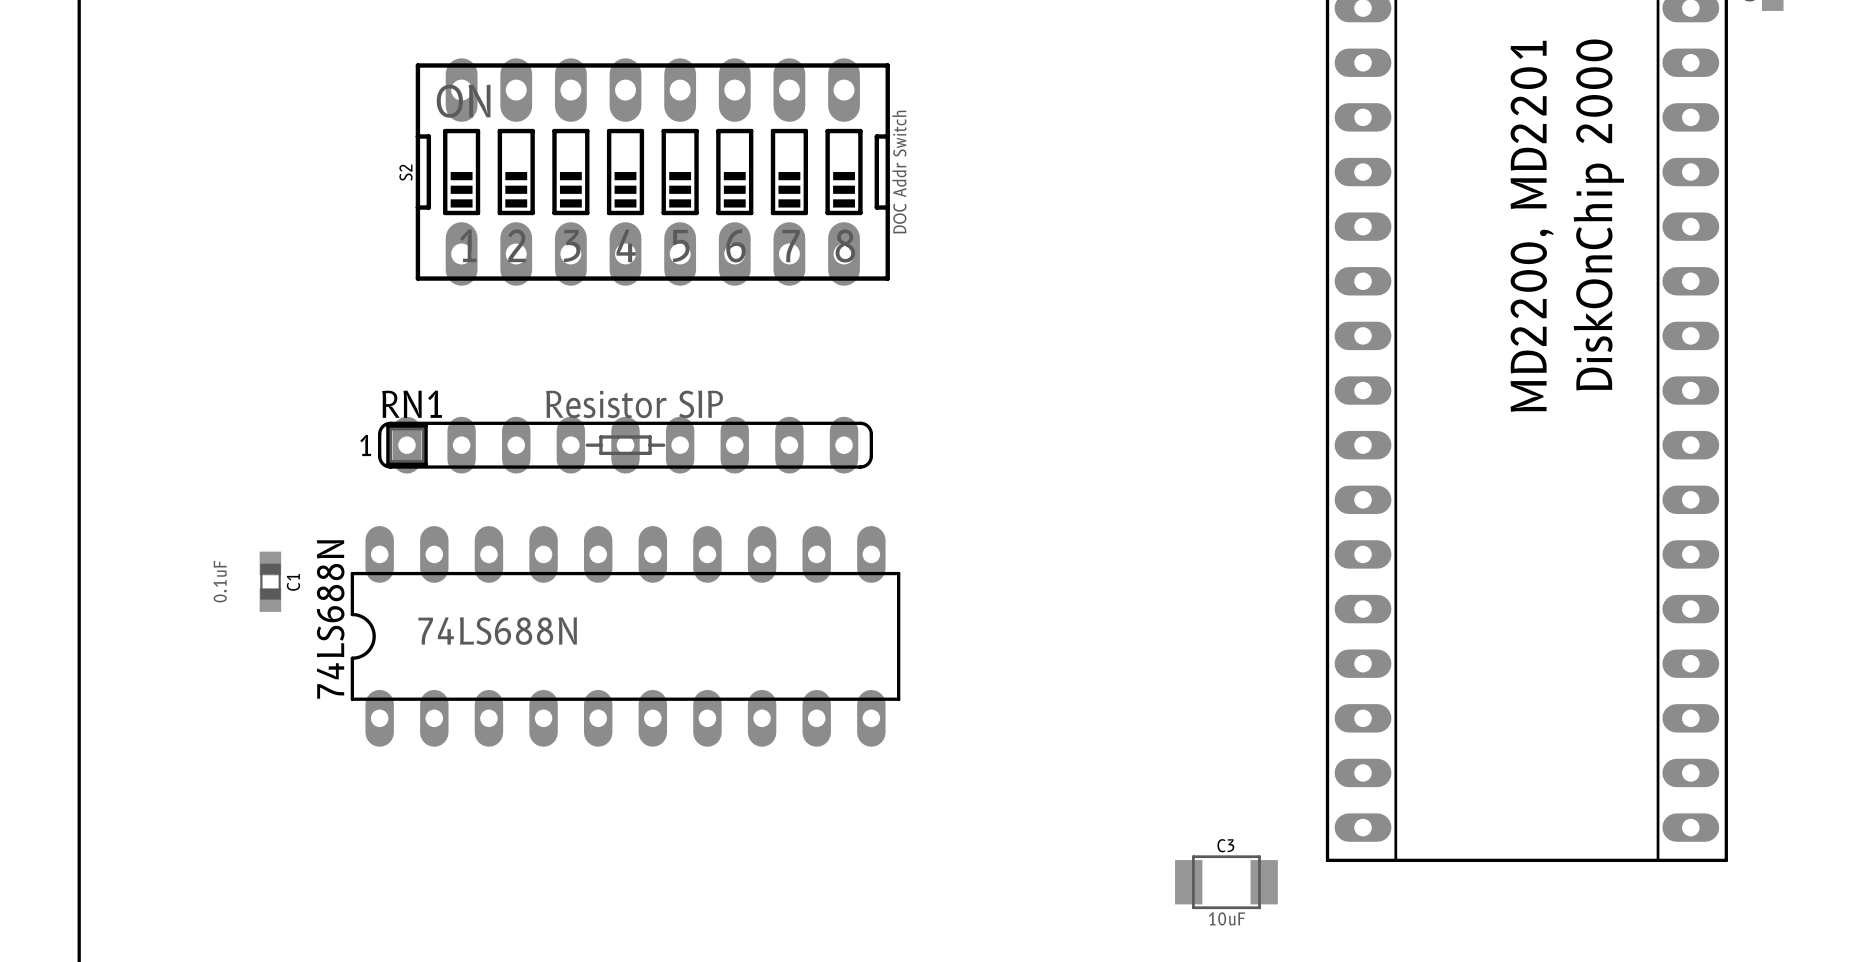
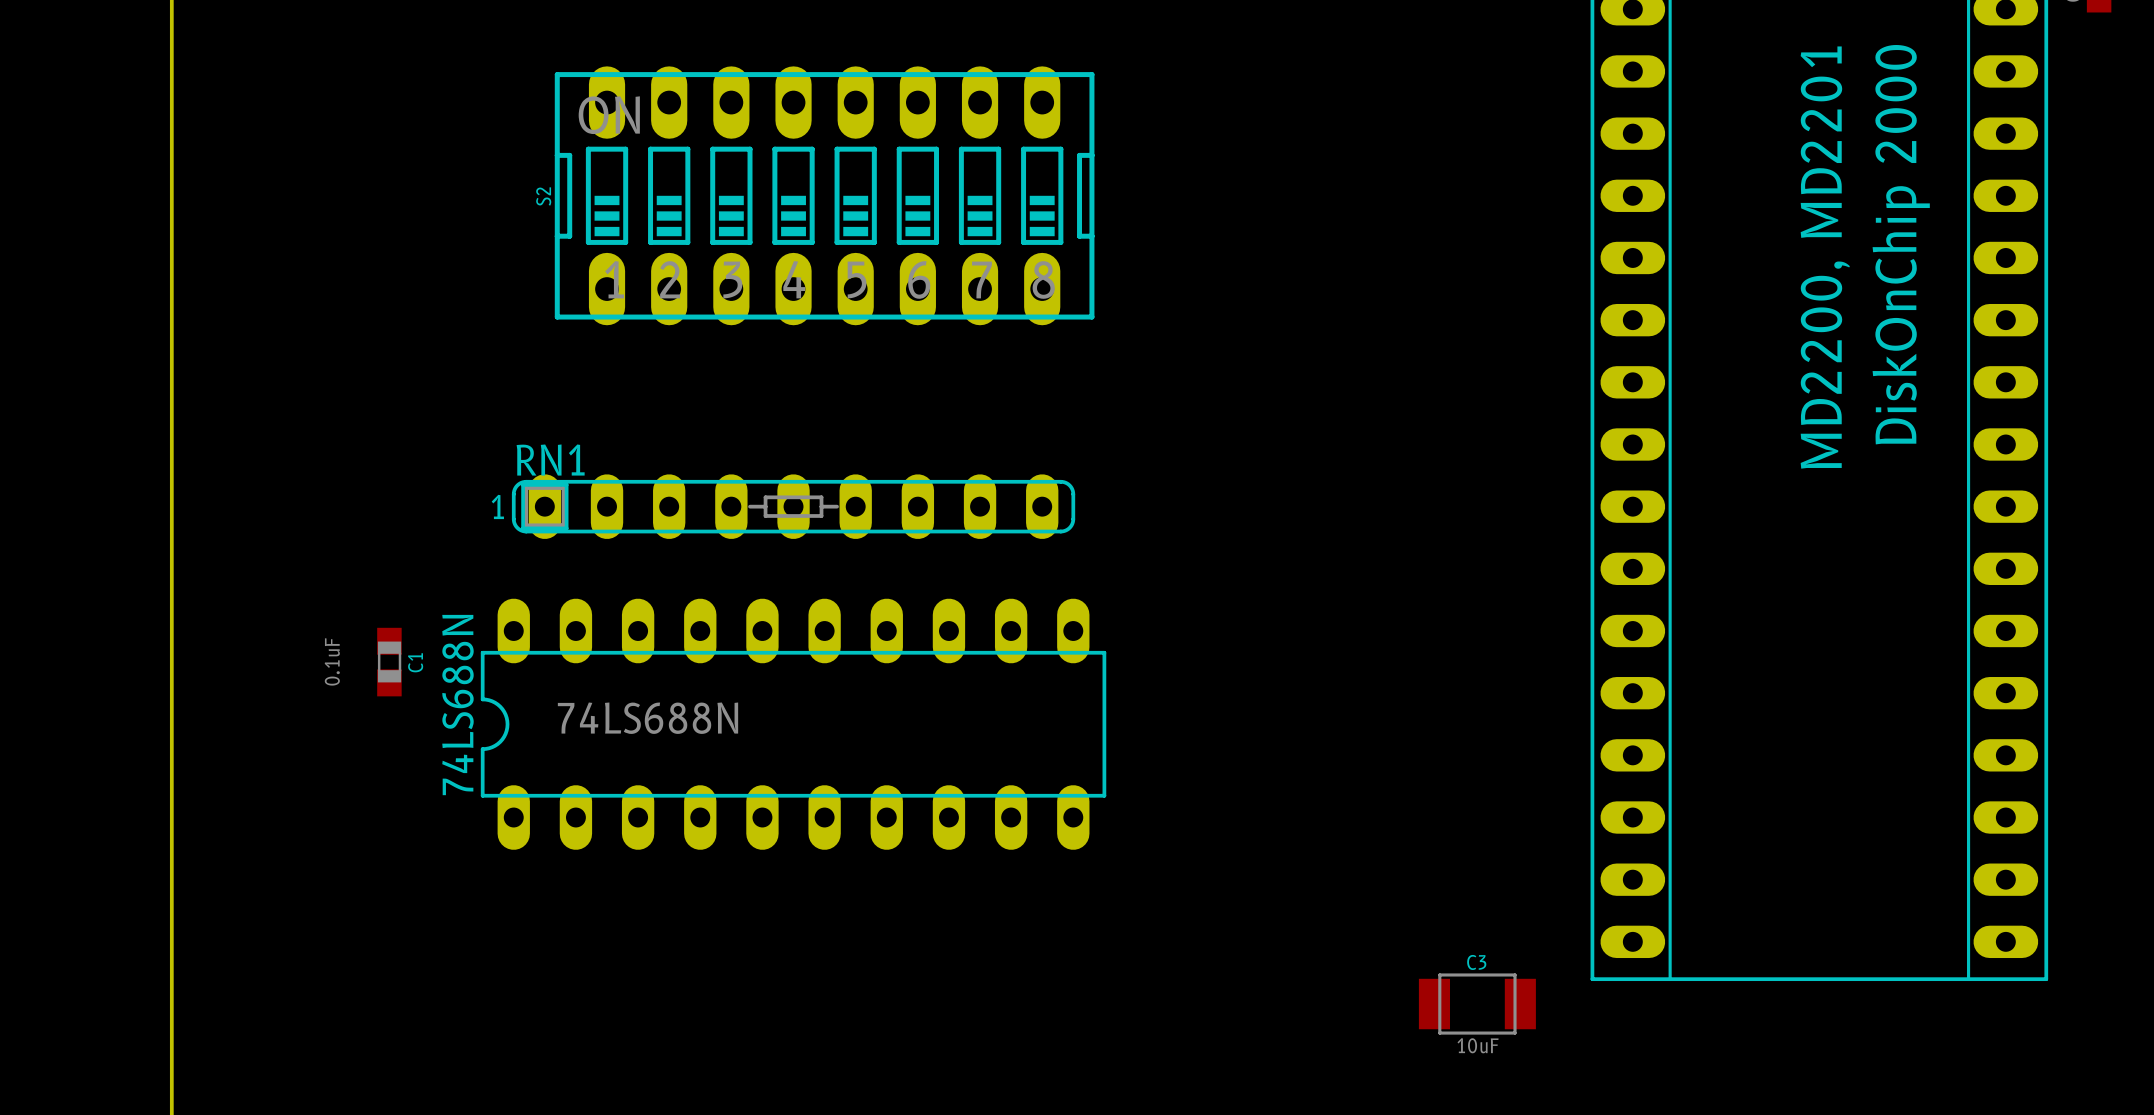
S2 value: DOC Addr Switch (899, 172) -> none
RN1 value: Resistor SIP (634, 404) -> none

